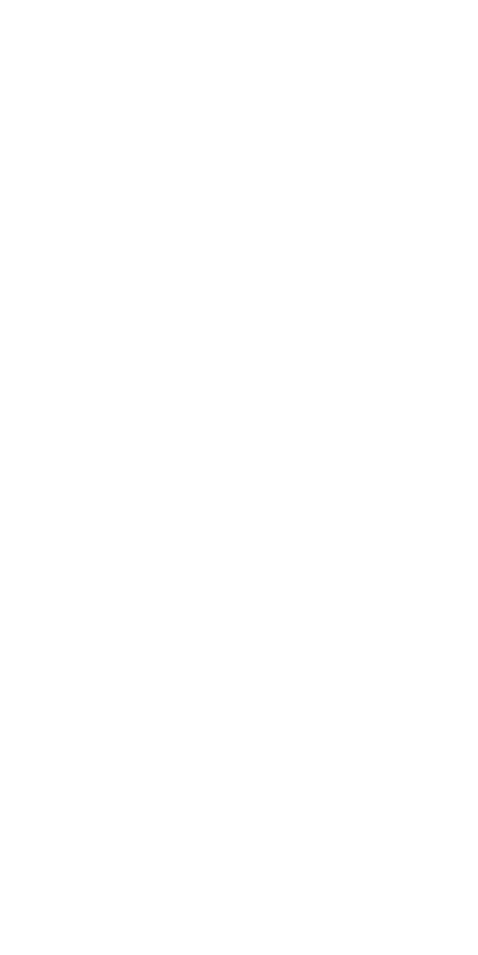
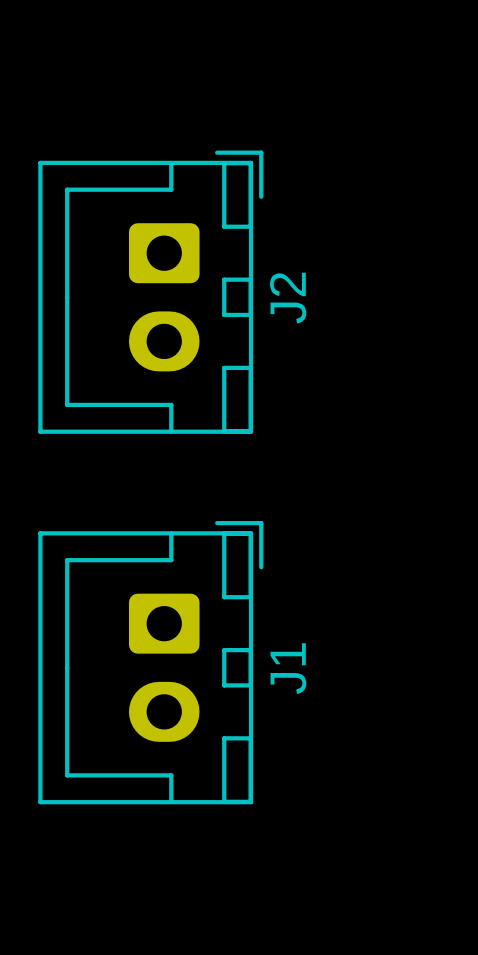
J2: none -> (150, 292)
J1: none -> (150, 662)

